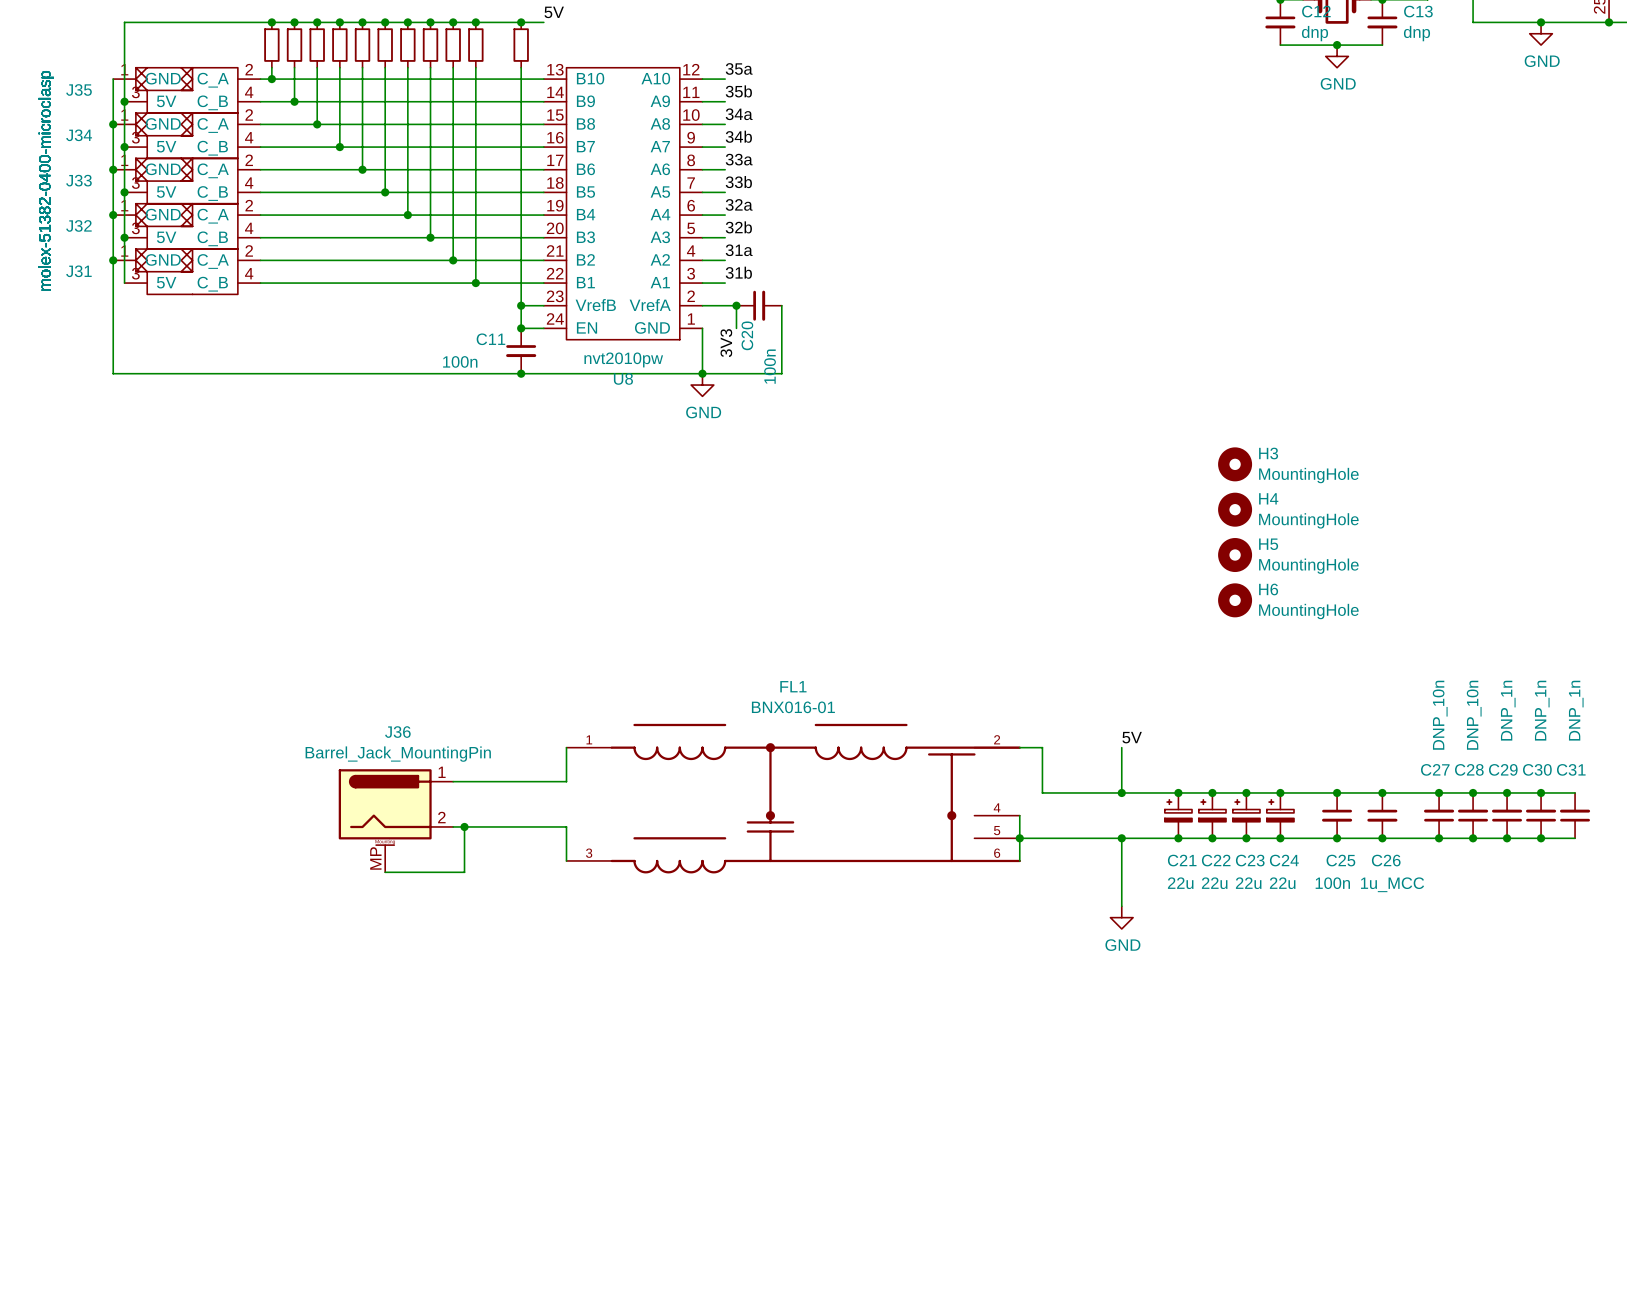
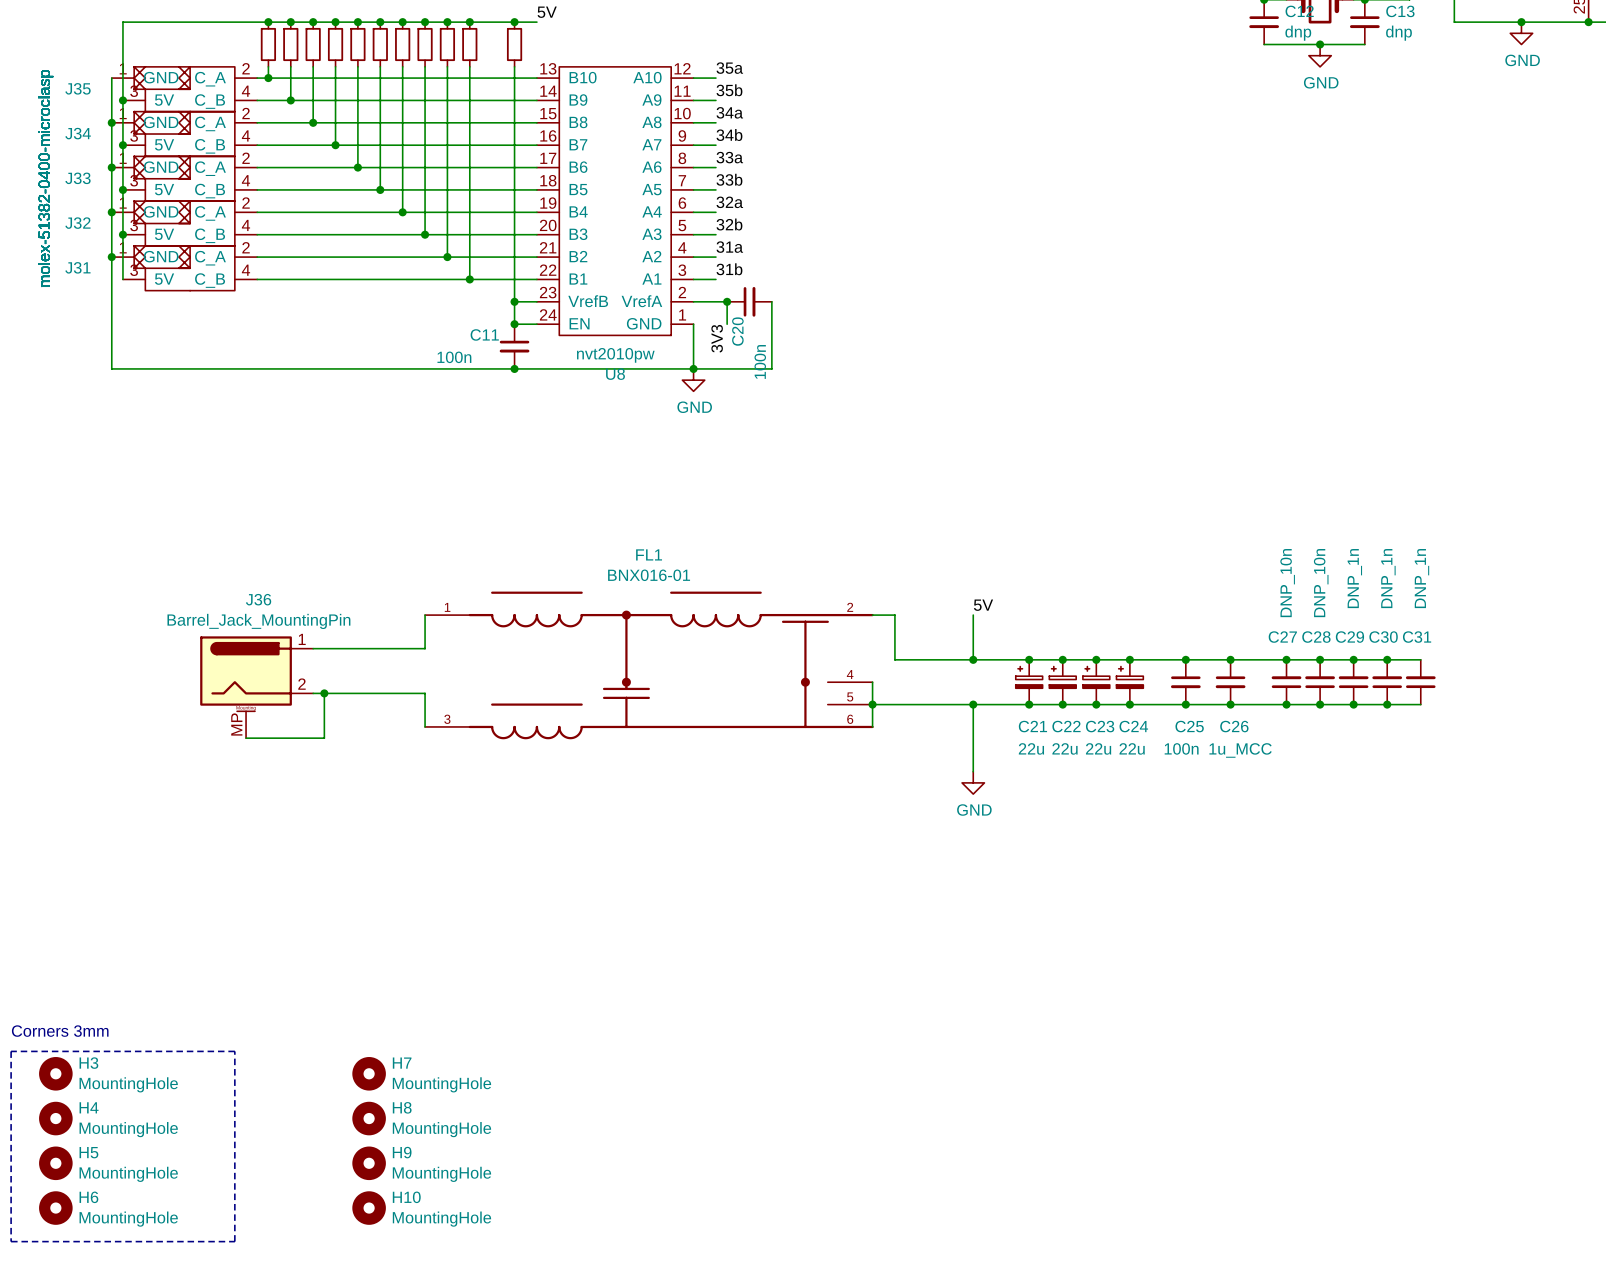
H3 position: (1235, 464) -> (55, 1073)
H4 position: (1235, 509) -> (55, 1118)
H5 position: (1235, 555) -> (55, 1163)
H6 position: (1235, 600) -> (55, 1208)
junction: none -> (973, 659)
junction: none -> (1029, 659)
junction: none -> (1062, 659)
junction: none -> (1096, 659)
junction: none -> (1129, 659)
junction: none -> (1185, 659)
junction: none -> (1230, 659)
junction: none -> (1286, 659)
junction: none -> (1320, 659)
junction: none -> (1353, 659)
junction: none -> (1387, 659)
junction: none -> (324, 693)
junction: none -> (872, 704)
junction: none -> (973, 704)
junction: none -> (1029, 704)
junction: none -> (1062, 704)
junction: none -> (1096, 704)
junction: none -> (1129, 704)
junction: none -> (1185, 704)
junction: none -> (1230, 704)
junction: none -> (1286, 704)
junction: none -> (1320, 704)
junction: none -> (1353, 704)
junction: none -> (1387, 704)
label position: 5V (1132, 737) -> 5V (983, 605)
wire: (566, 747) (566, 781) (453, 781) -> (425, 615) (425, 648) (313, 648)
wire: (1019, 747) (1042, 747) (1042, 792) (1575, 792) -> (872, 615) (894, 615) (894, 659) (1420, 659)
wire: (1121, 747) (1121, 792) -> (973, 615) (973, 659)
junction: (1121, 792) -> none
junction: (1178, 792) -> none
junction: (1212, 792) -> none
junction: (1246, 792) -> none
junction: (1280, 792) -> none
junction: (1337, 792) -> none
junction: (1382, 792) -> none
junction: (1439, 792) -> none
junction: (1473, 792) -> none
junction: (1507, 792) -> none
junction: (1541, 792) -> none
FL1 position: (793, 798) -> (649, 665)
wire: (1019, 815) (1019, 860) -> (872, 682) (872, 726)
C21 position: (1178, 815) -> (1029, 682)
C22 position: (1212, 815) -> (1062, 682)
C23 position: (1246, 815) -> (1096, 682)
C24 position: (1280, 815) -> (1129, 682)
C25 position: (1337, 815) -> (1185, 682)
C26 position: (1382, 815) -> (1230, 682)
C27 position: (1439, 815) -> (1286, 682)
C28 position: (1473, 815) -> (1320, 682)
C29 position: (1507, 815) -> (1353, 682)
C30 position: (1541, 815) -> (1387, 682)
C31 position: (1575, 815) -> (1420, 682)
J36 position: (395, 820) -> (256, 687)
wire: (453, 826) (566, 826) (566, 860) -> (313, 693) (425, 693) (425, 726)
wire: (464, 826) (464, 872) (385, 872) -> (324, 693) (324, 738) (246, 738)
junction: (464, 826) -> none
wire: (1019, 838) (1575, 838) -> (872, 704) (1420, 704)
junction: (1019, 838) -> none
wire: (1121, 838) (1121, 906) -> (973, 704) (973, 771)
junction: (1121, 838) -> none
junction: (1178, 838) -> none
junction: (1212, 838) -> none
junction: (1246, 838) -> none
junction: (1280, 838) -> none
junction: (1337, 838) -> none
junction: (1382, 838) -> none
junction: (1439, 838) -> none
junction: (1473, 838) -> none
junction: (1507, 838) -> none
junction: (1541, 838) -> none
power symbol position: GND (1121, 917) -> GND (973, 782)
text: none -> Corners 3mm (60, 1031)
line: none -> (11, 1051) (11, 1241) (234, 1241) (234, 1051) (11, 1051)
H7: none -> MountingHole (369, 1073)
H8: none -> MountingHole (369, 1118)
H9: none -> MountingHole (369, 1163)
H10: none -> MountingHole (369, 1208)

